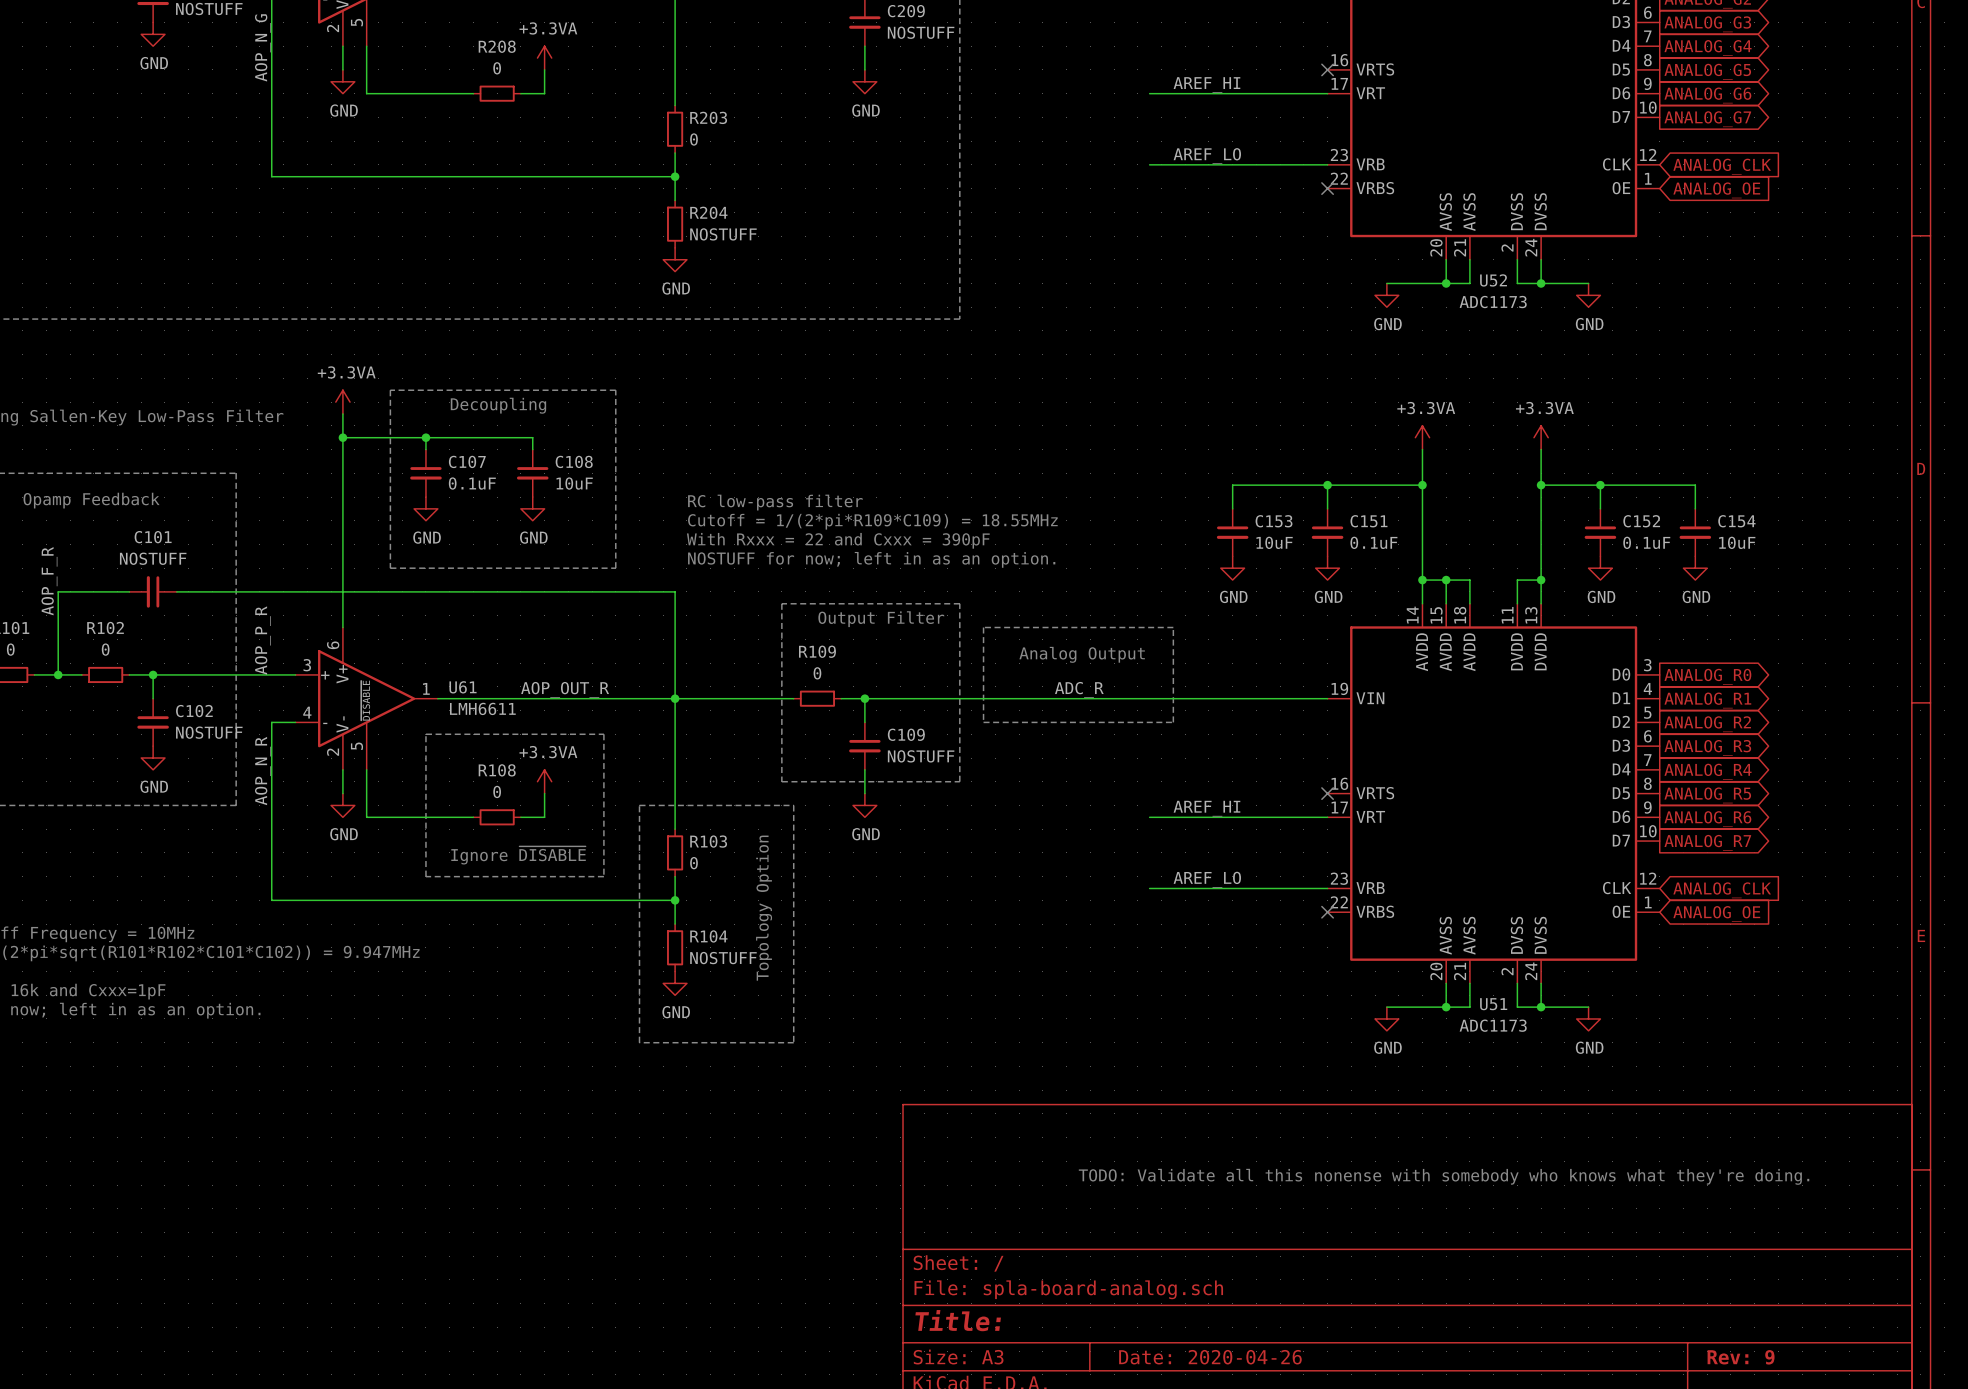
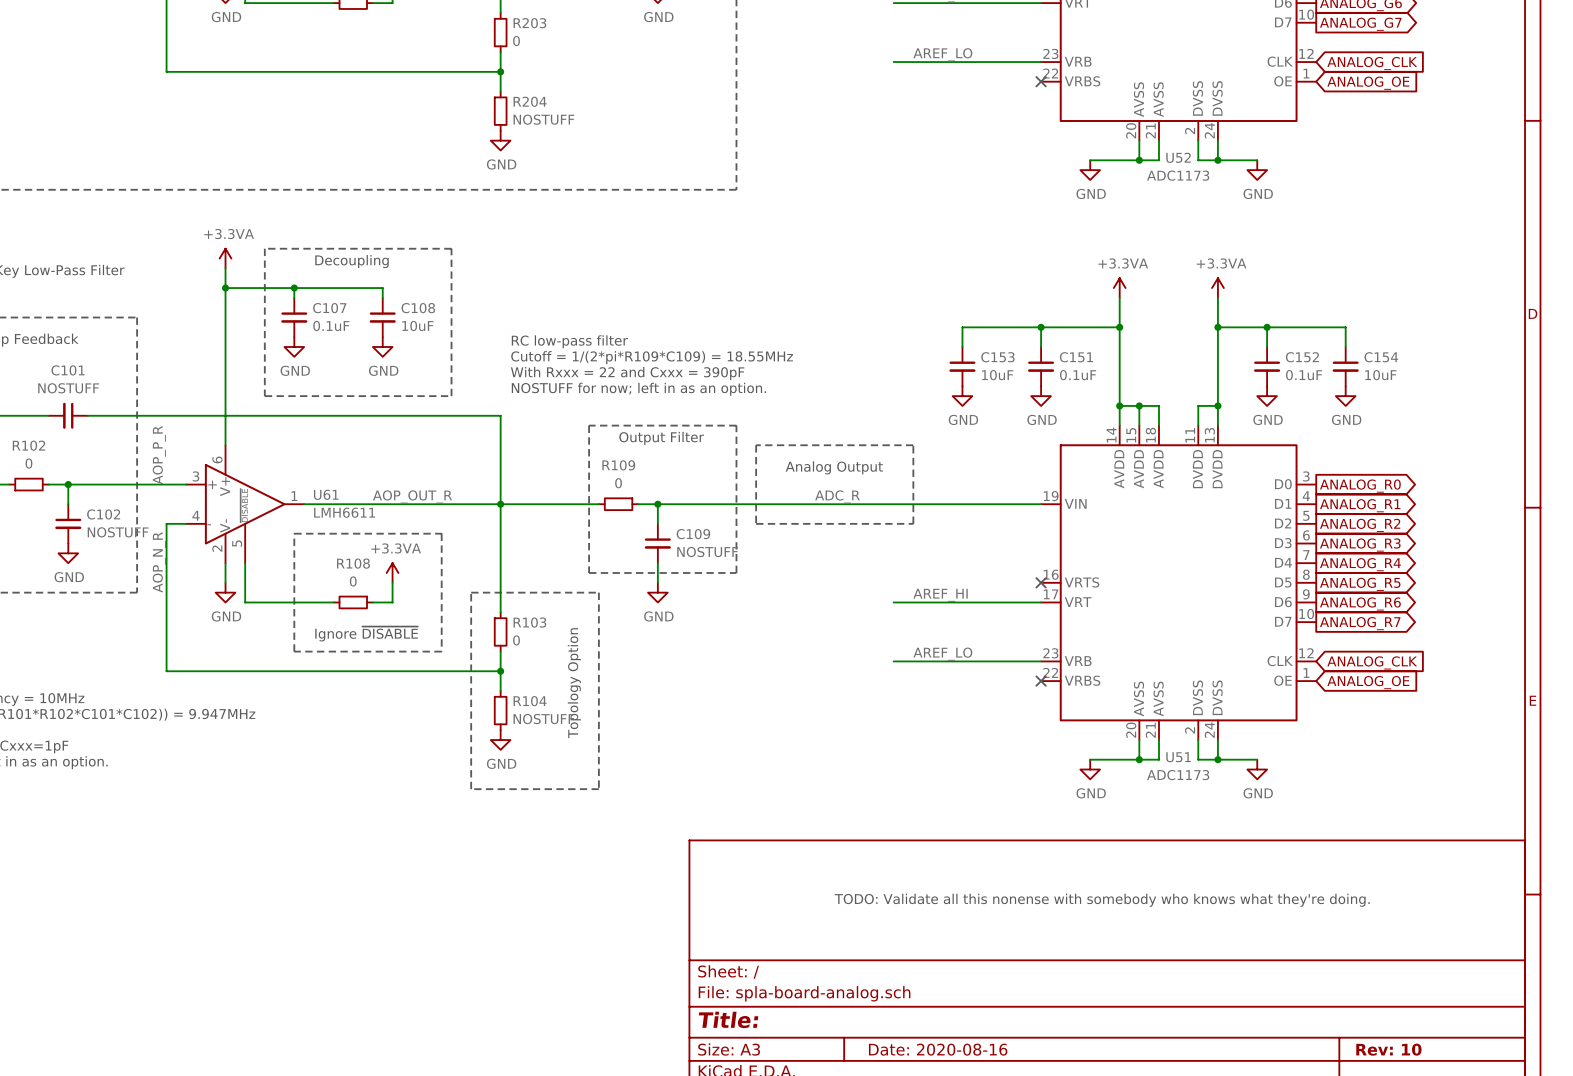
title block: Date: 2020-04-26 (1210, 1357) -> Date: 2020-08-16 (938, 1049)
title block: Rev: 9 (1741, 1357) -> Rev: 10 (1388, 1049)

